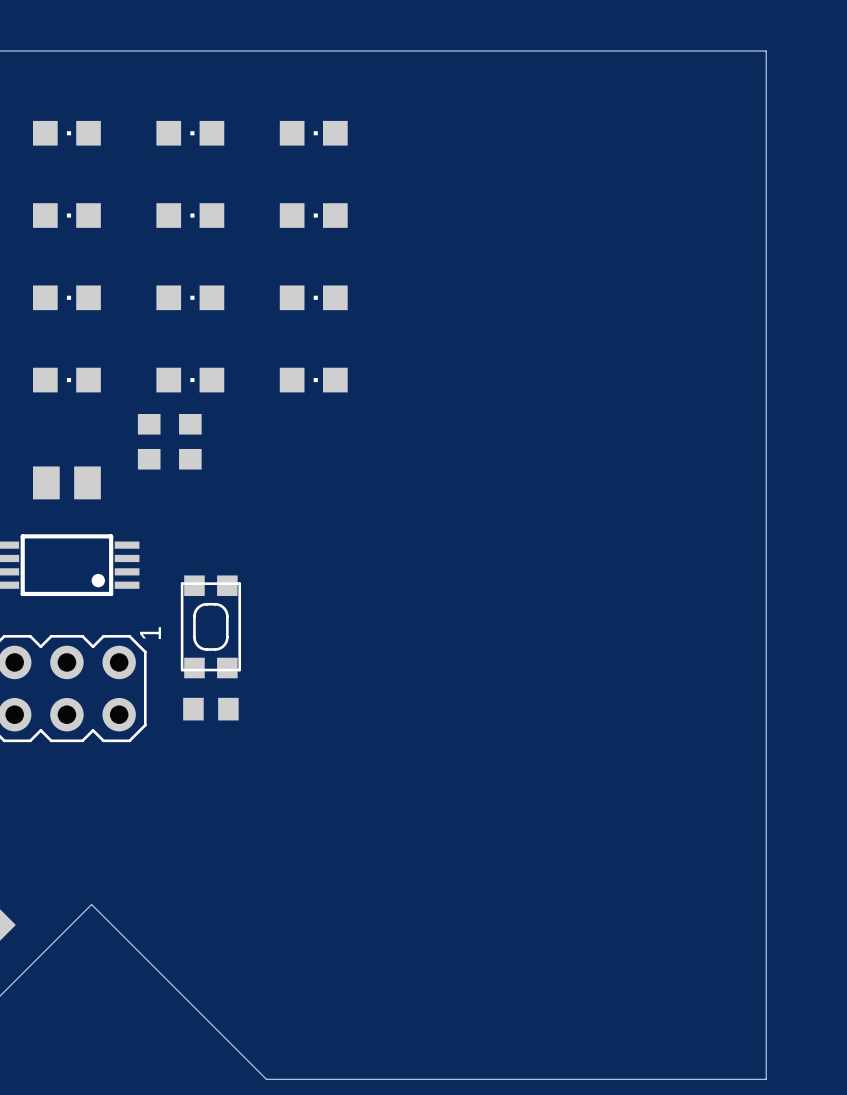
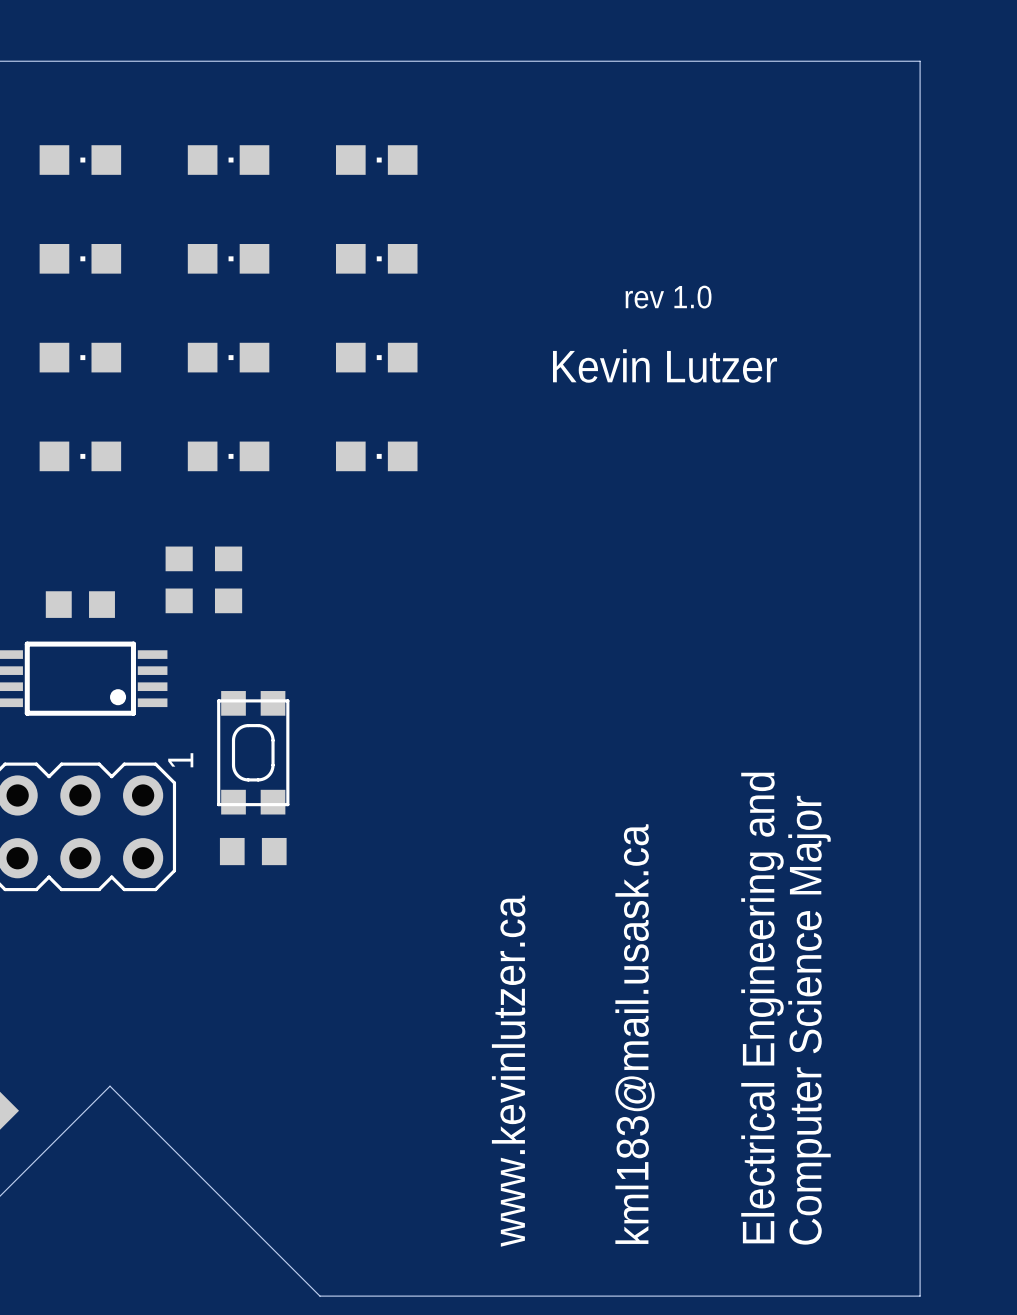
text: none -> rev 1.0 (668, 297)
text: none -> Kevin Lutzer (665, 366)
part: (149, 441) -> none
part: (190, 441) -> none
part footprint: [33, 466, 101, 500] -> [45, 591, 115, 618]
part: none -> (179, 579)
part: none -> (228, 579)
text: none -> Electrical Engineering and (762, 1007)
text: none -> Computer Science Major (809, 1020)
text: none -> kml183@mail.usask.ca (635, 1034)
text: none -> www.kevinlutzer.ca (508, 1071)

